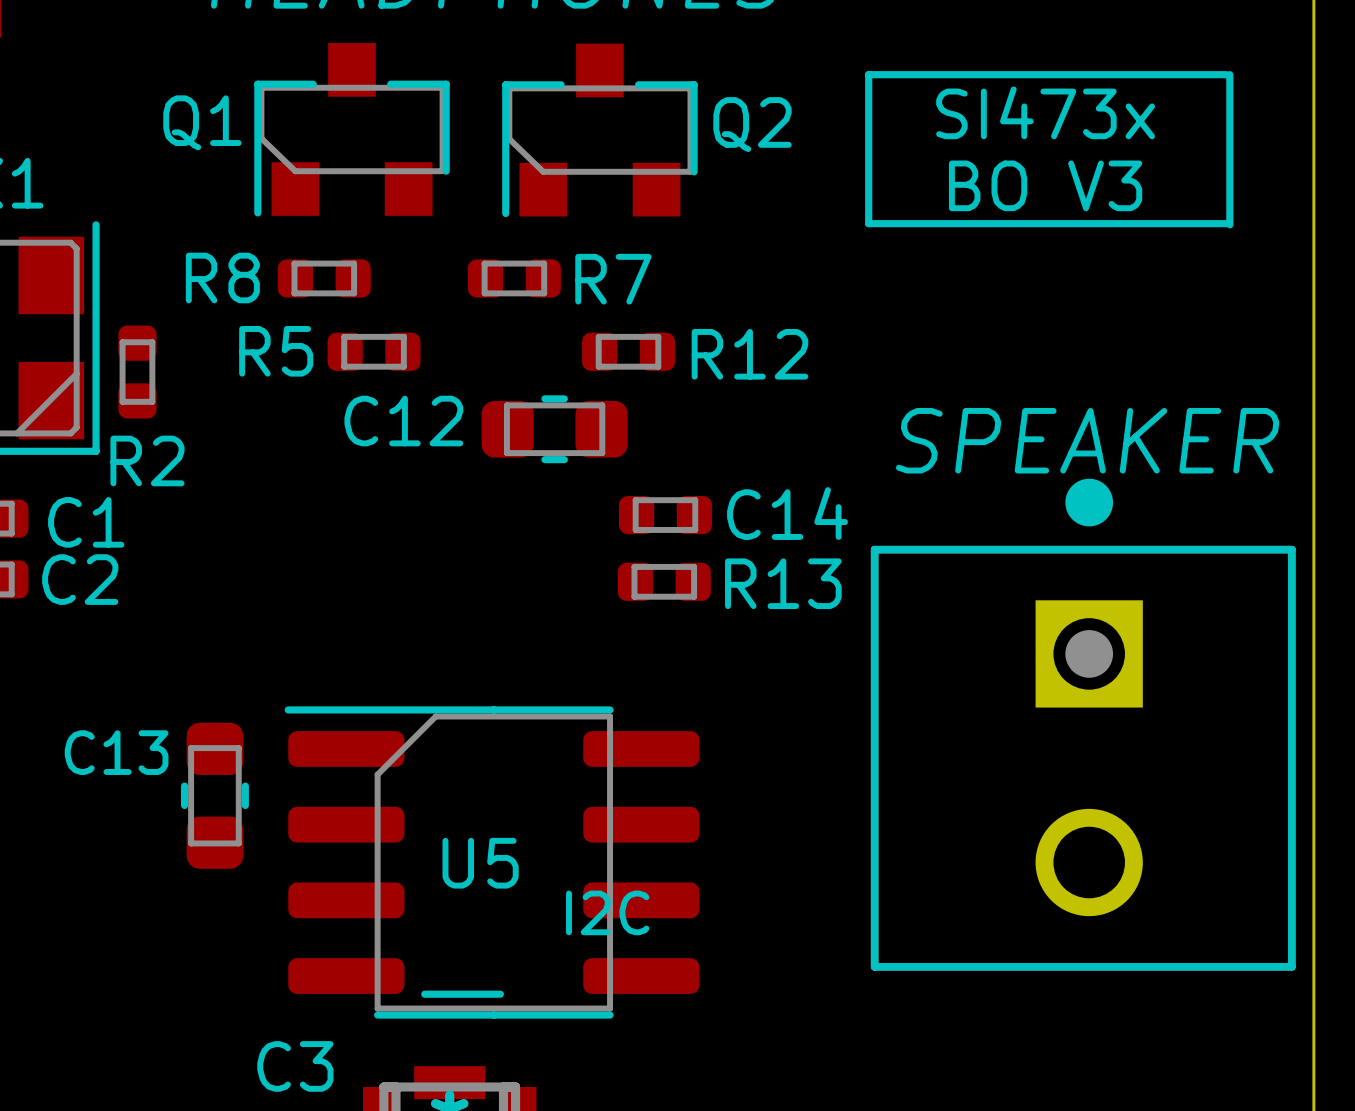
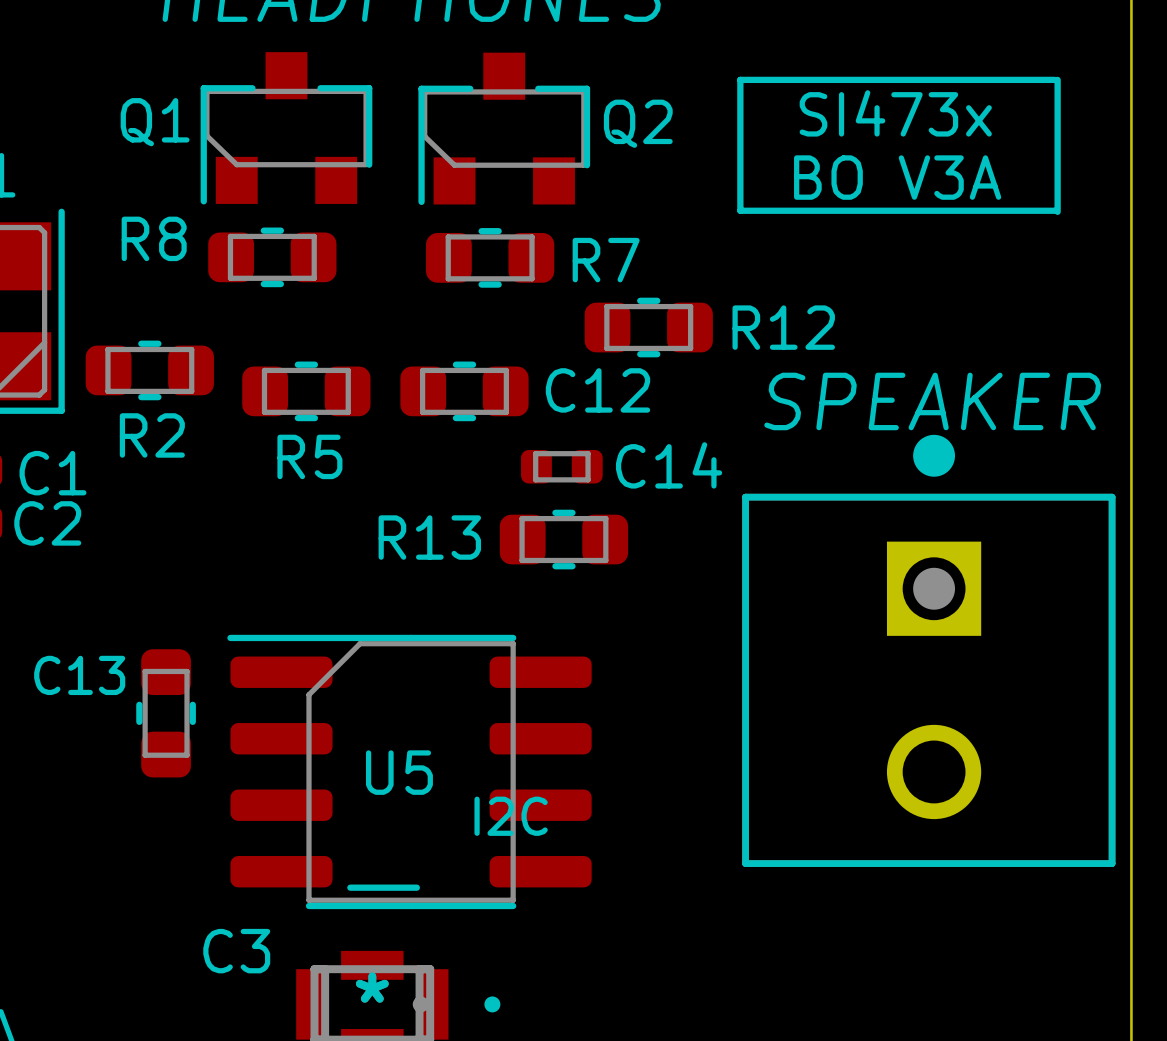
text: BO V3 (1045, 185) -> BO V3A (897, 177)
R8 footprint: [277, 259, 371, 298] -> [208, 227, 337, 288]
R7 footprint: [467, 259, 561, 298] -> [426, 228, 555, 288]
R2 footprint: [118, 325, 157, 419] -> [85, 340, 214, 401]
R5 footprint: [327, 332, 421, 371] -> [242, 361, 371, 422]
R12 footprint: [582, 332, 676, 371] -> [584, 297, 713, 358]
R5 name position: R5 (276, 351) -> R5 (309, 456)
C12 name position: C12 (403, 421) -> C12 (597, 390)
R13 footprint: [617, 562, 711, 601] -> [499, 509, 629, 570]
R13 name position: R13 (783, 583) -> R13 (429, 537)

